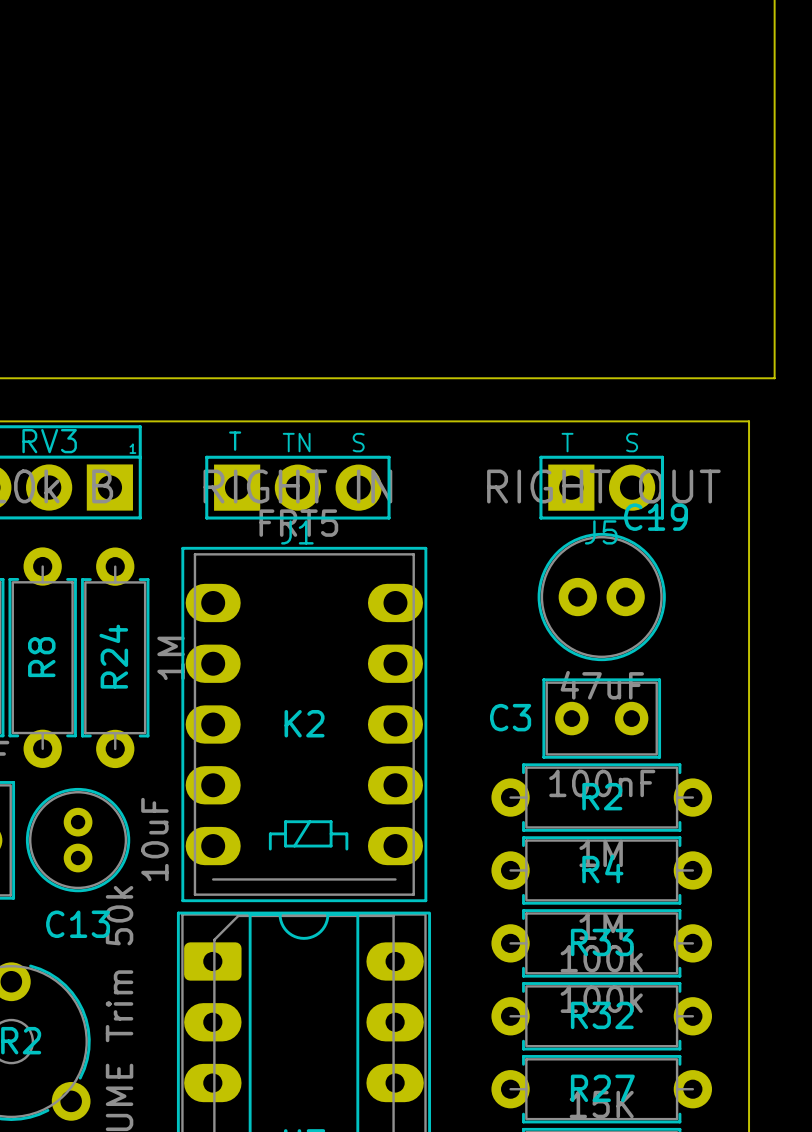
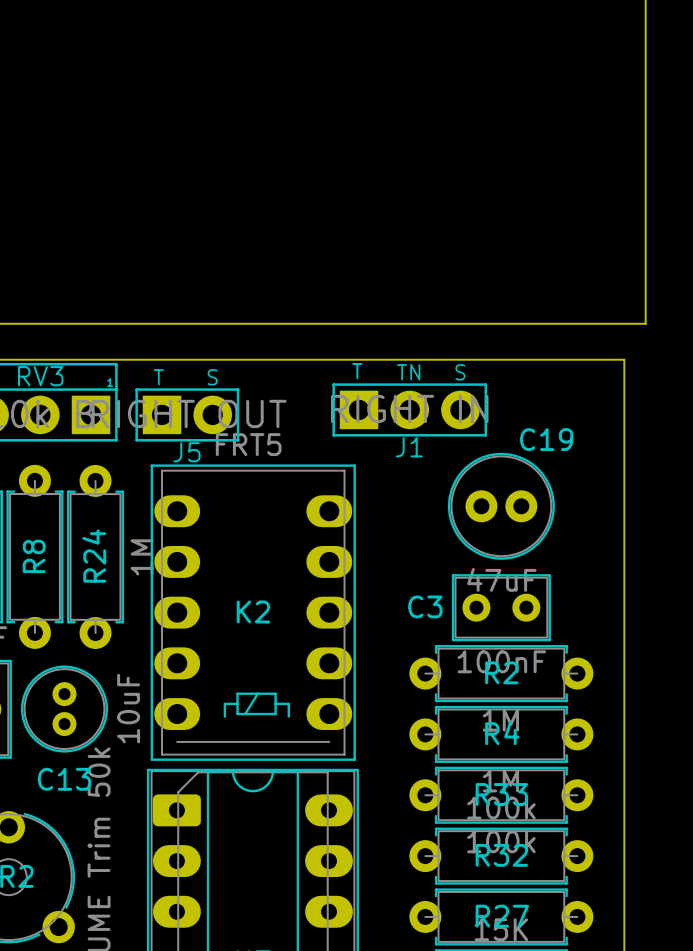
J1 position: (297, 487) -> (409, 409)
J5 position: (601, 487) -> (187, 414)

